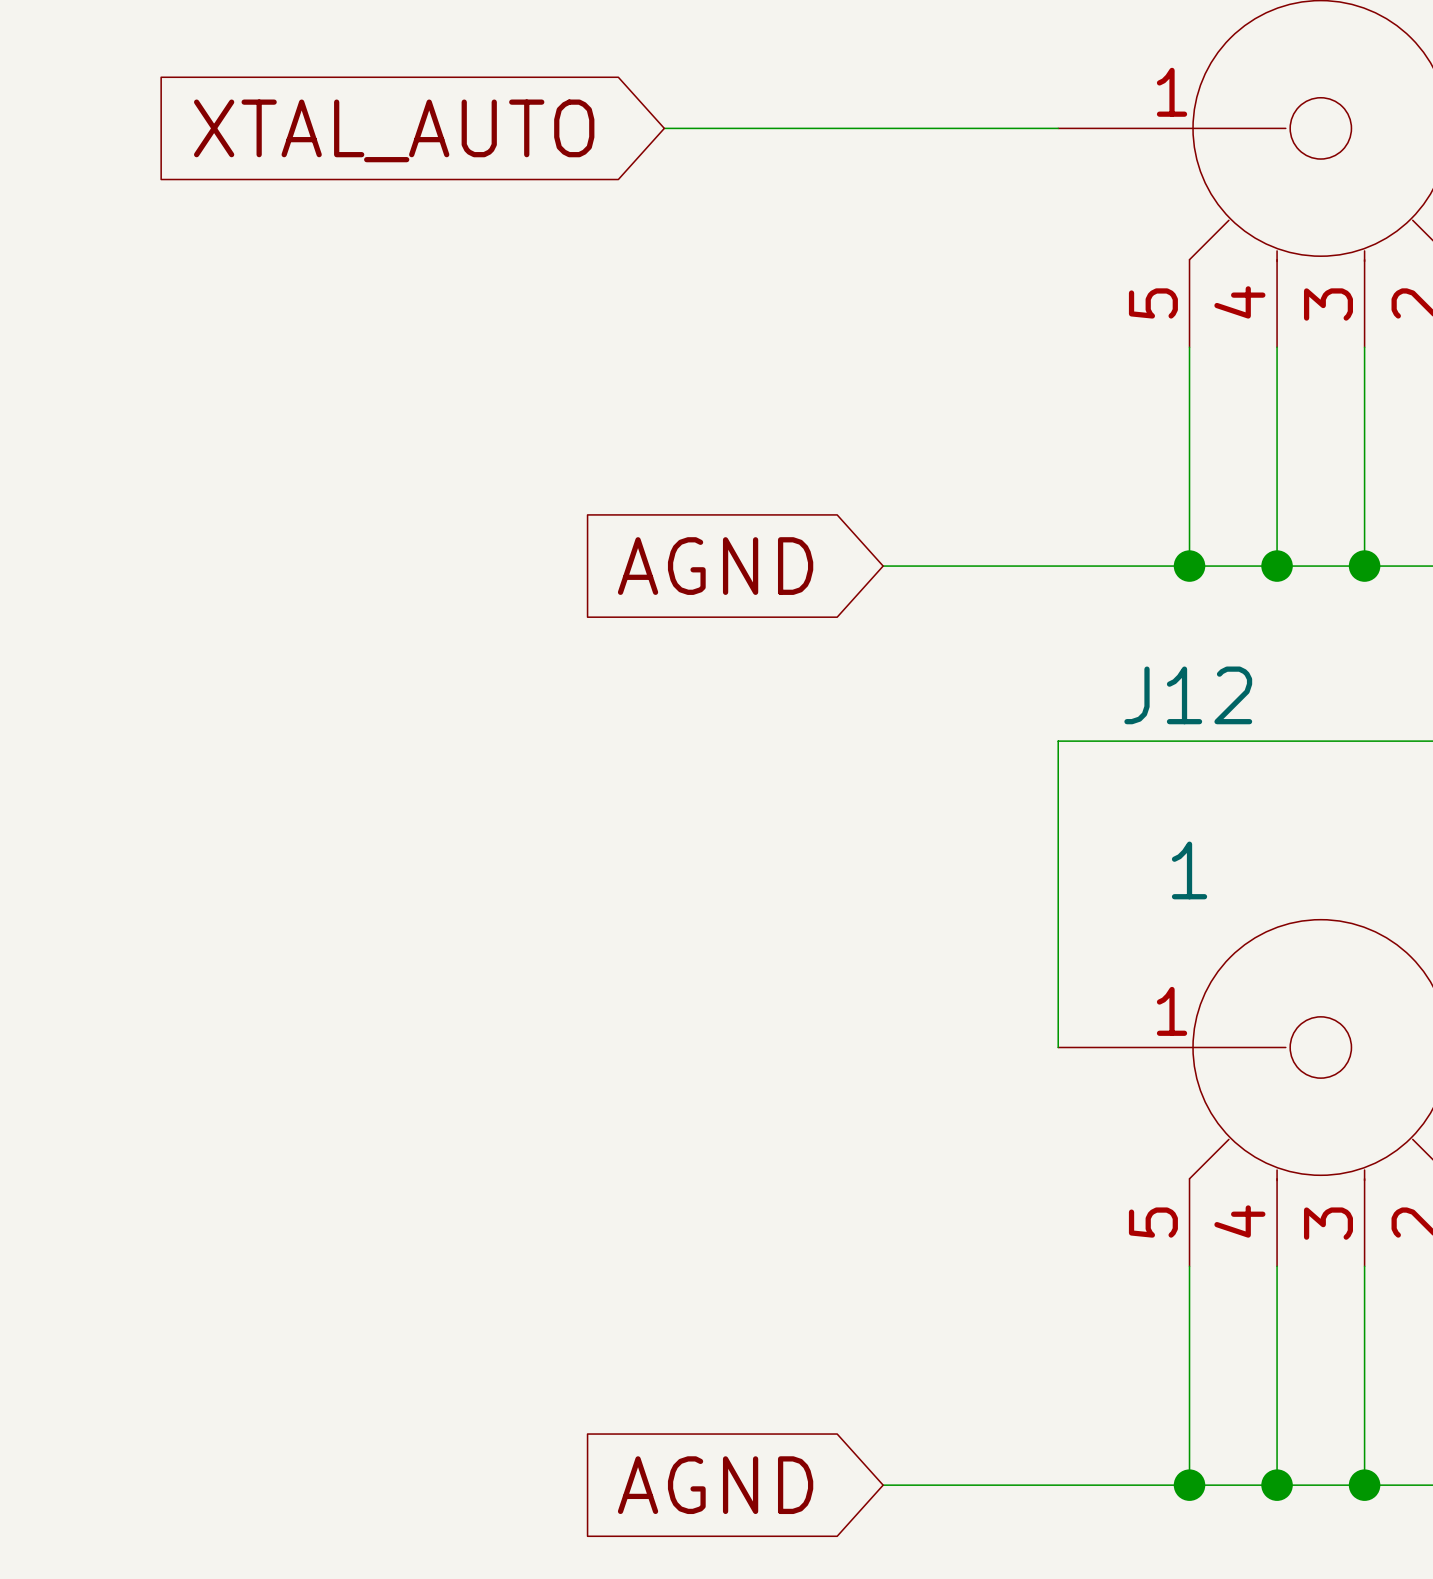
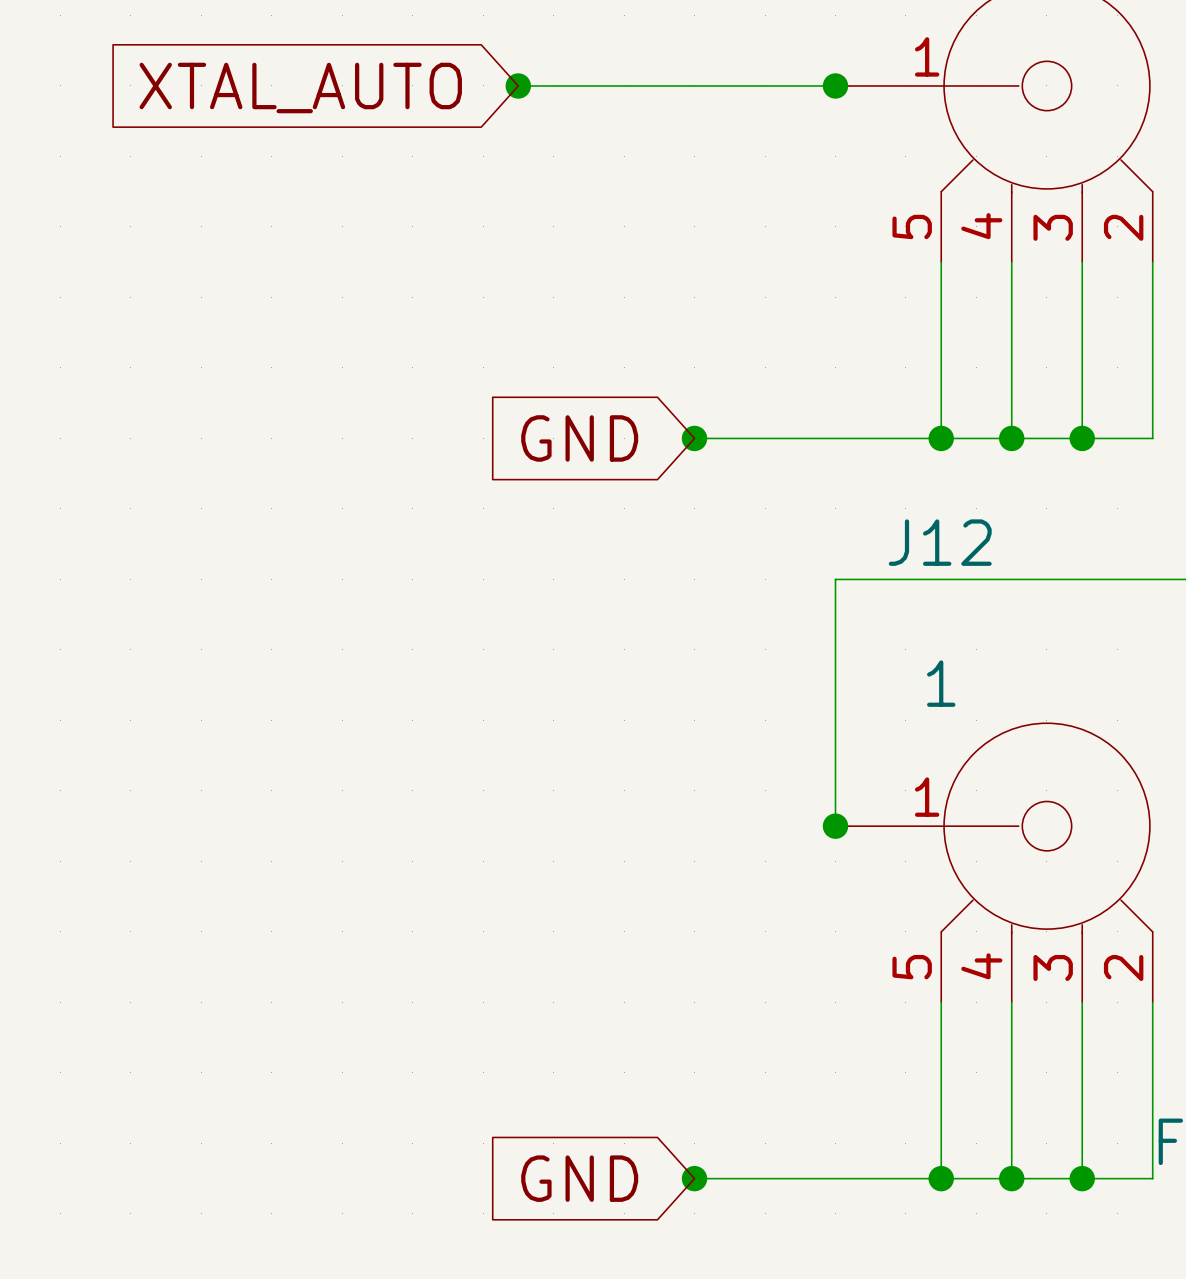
junction: none -> (518, 85)
junction: none -> (835, 85)
global label: AGND (715, 566) -> GND (579, 438)
junction: none -> (694, 438)
junction: none -> (835, 826)
global label: AGND (715, 1485) -> GND (579, 1178)
junction: none -> (694, 1178)

